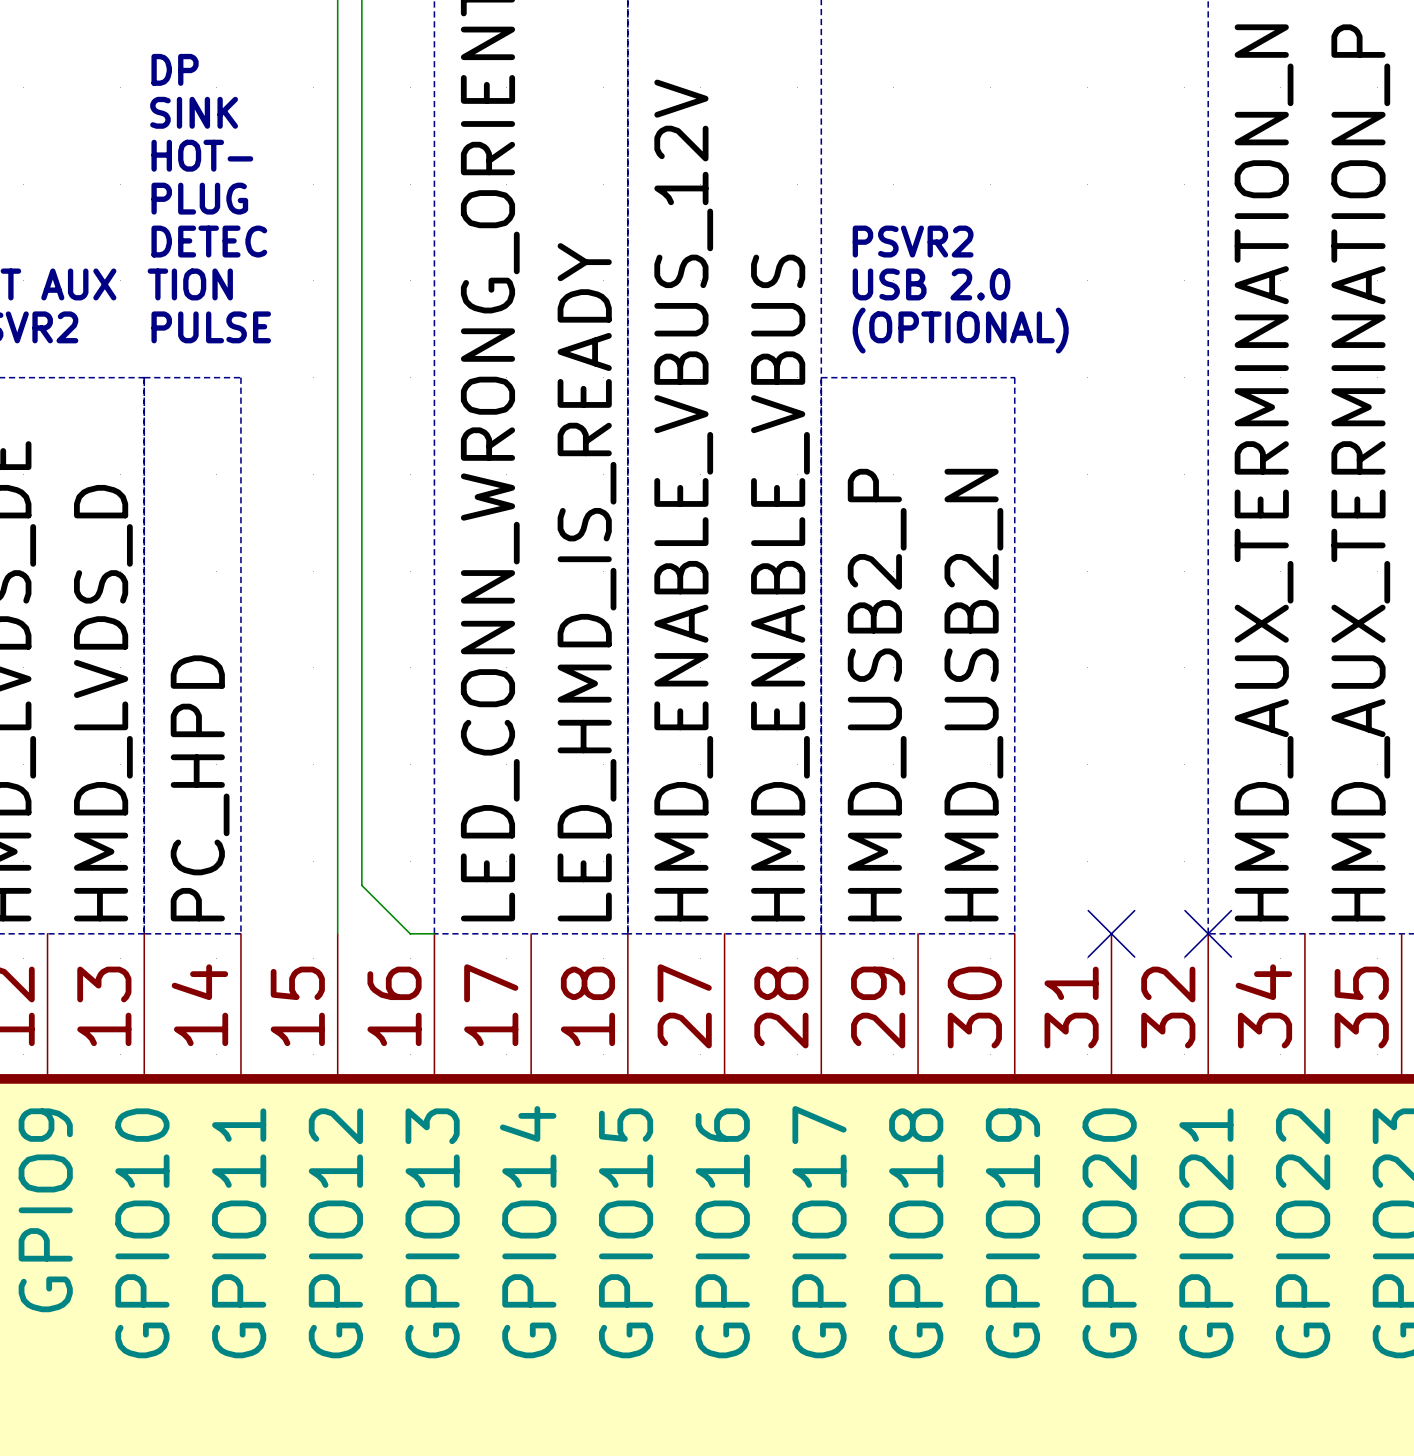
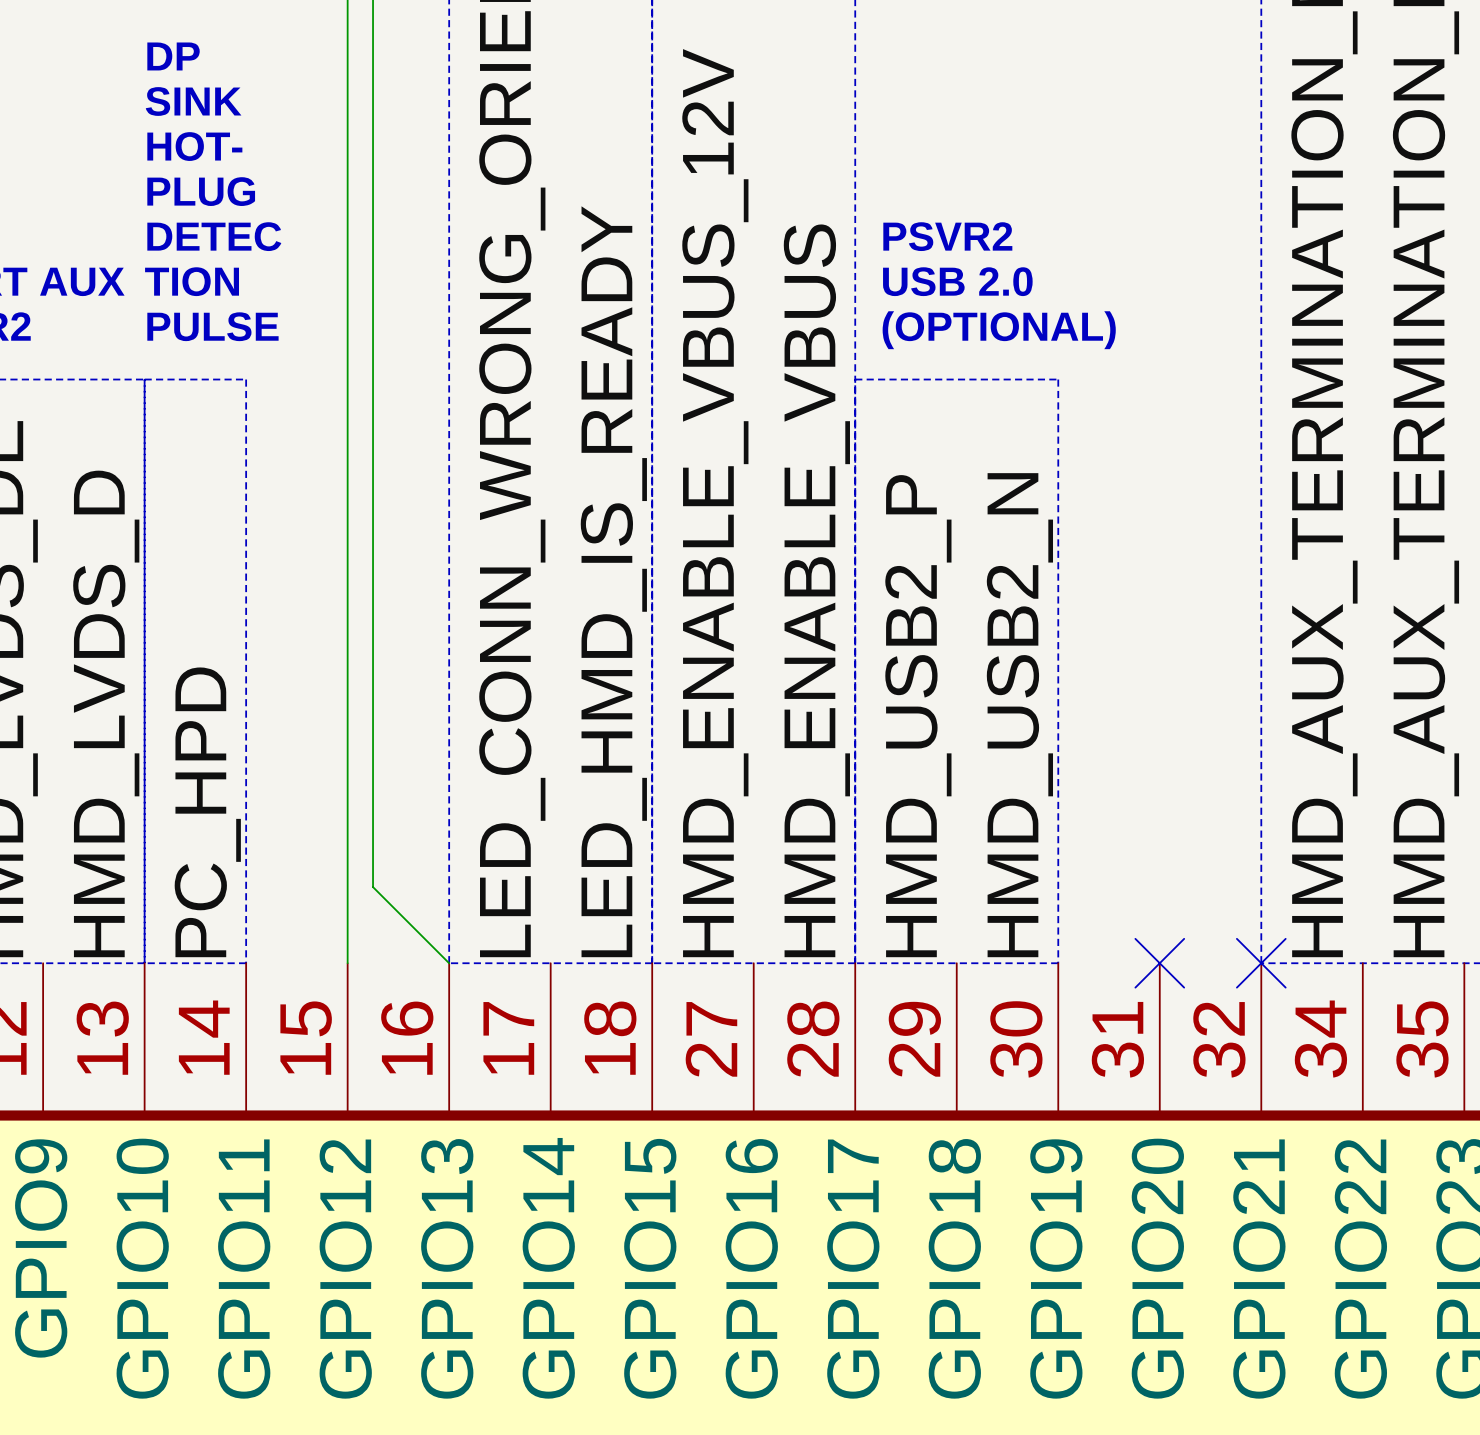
wire: (361, 861) (361, 885) (410, 933) (434, 933) -> (373, 887) (449, 963)

